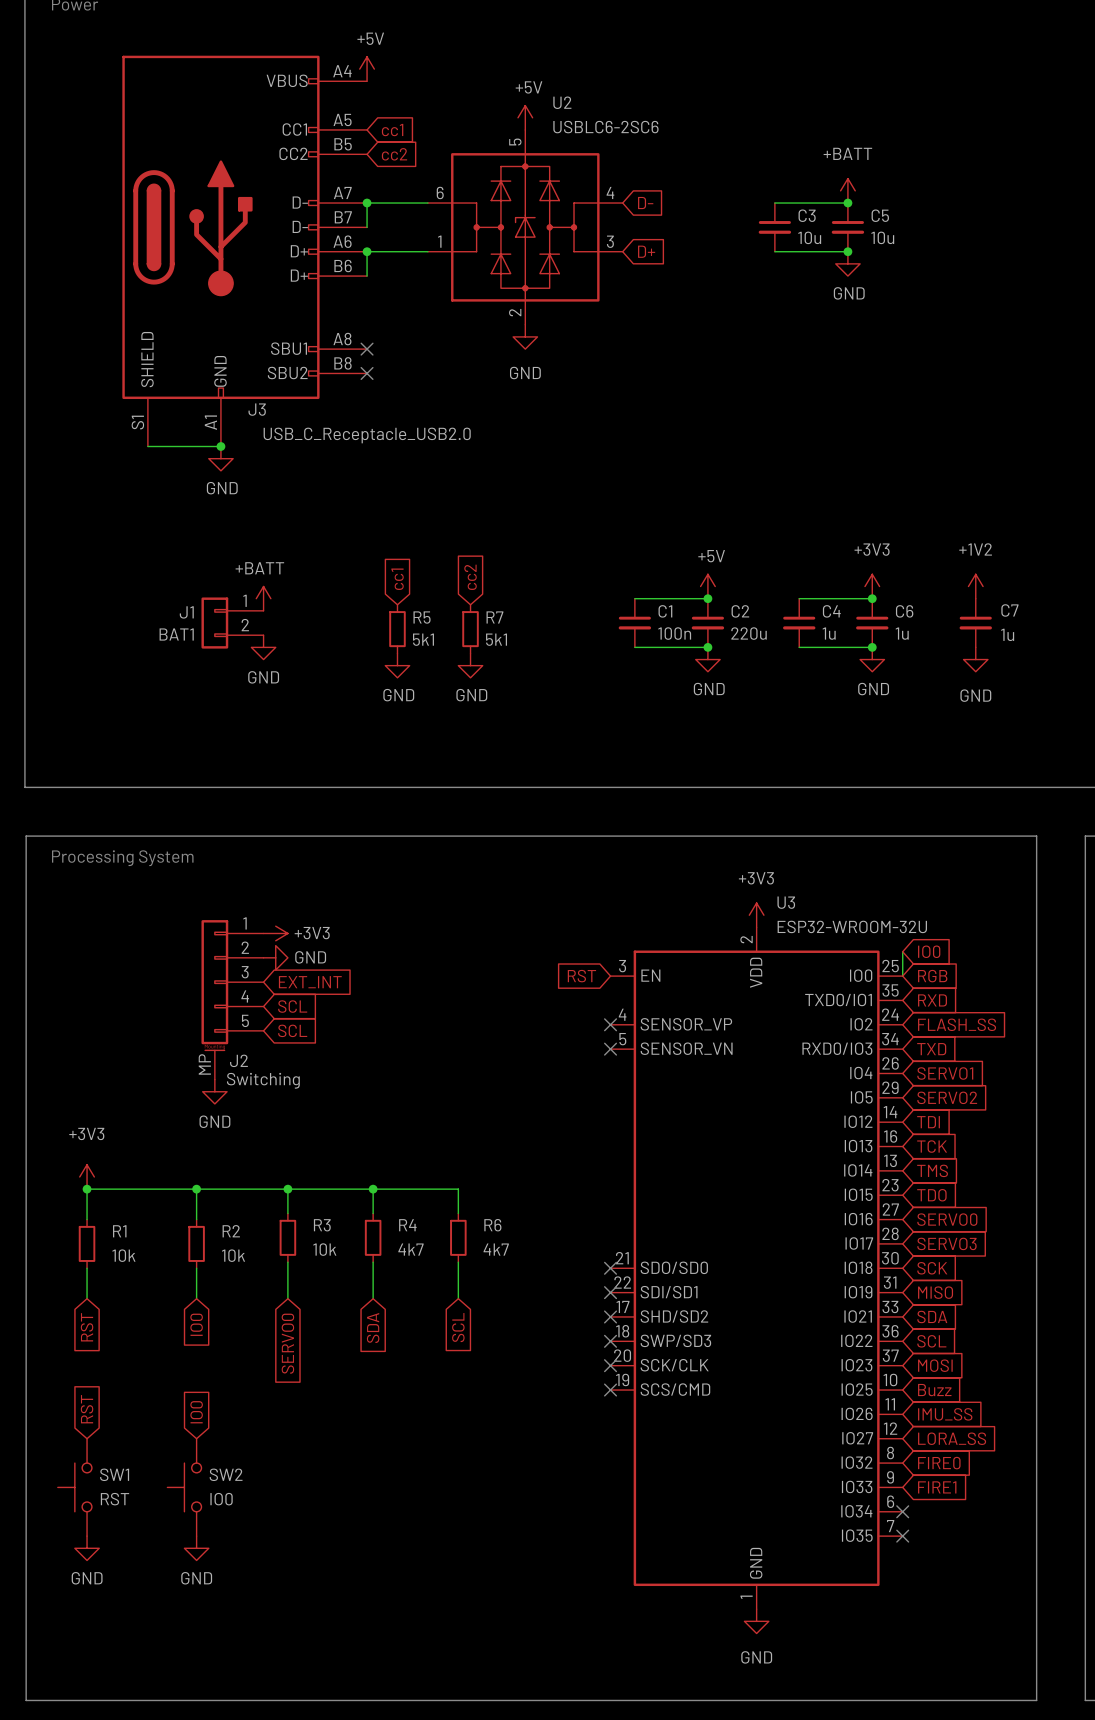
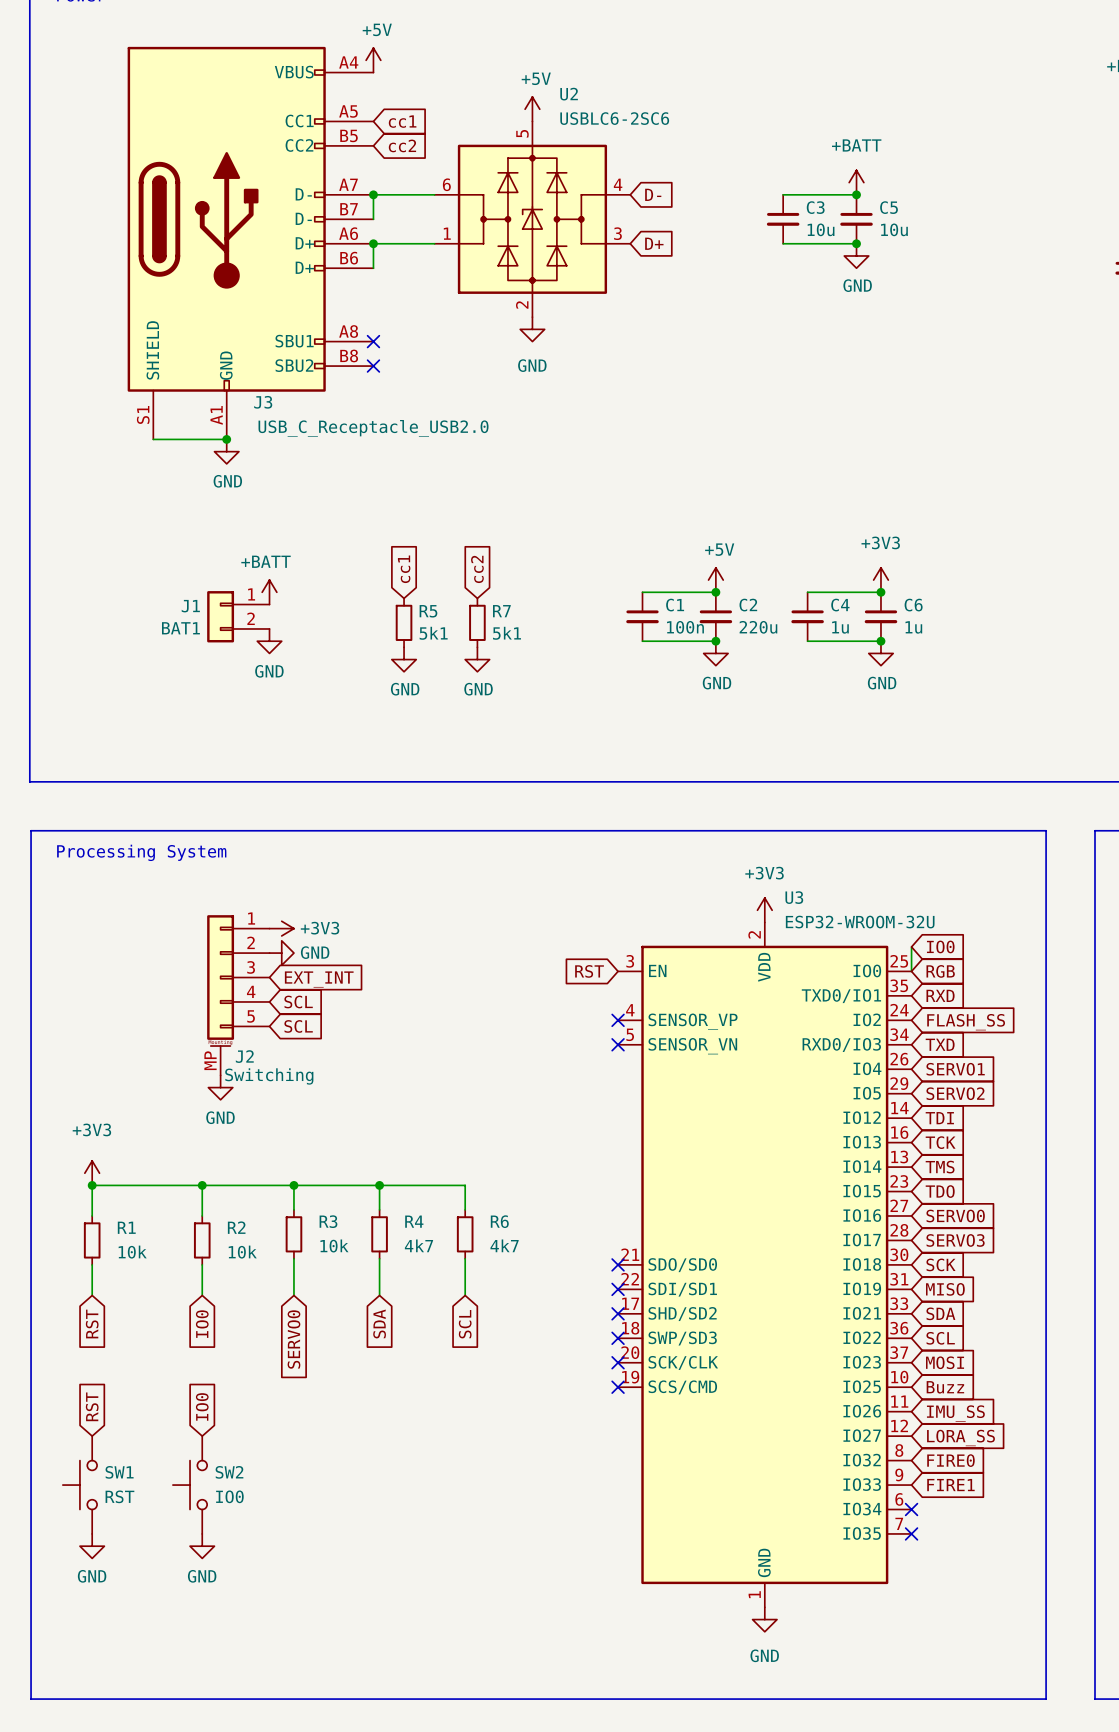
power symbol: +1V2 (975, 586) -> none
C7: 1u (975, 623) -> none
power symbol: GND (975, 659) -> none

